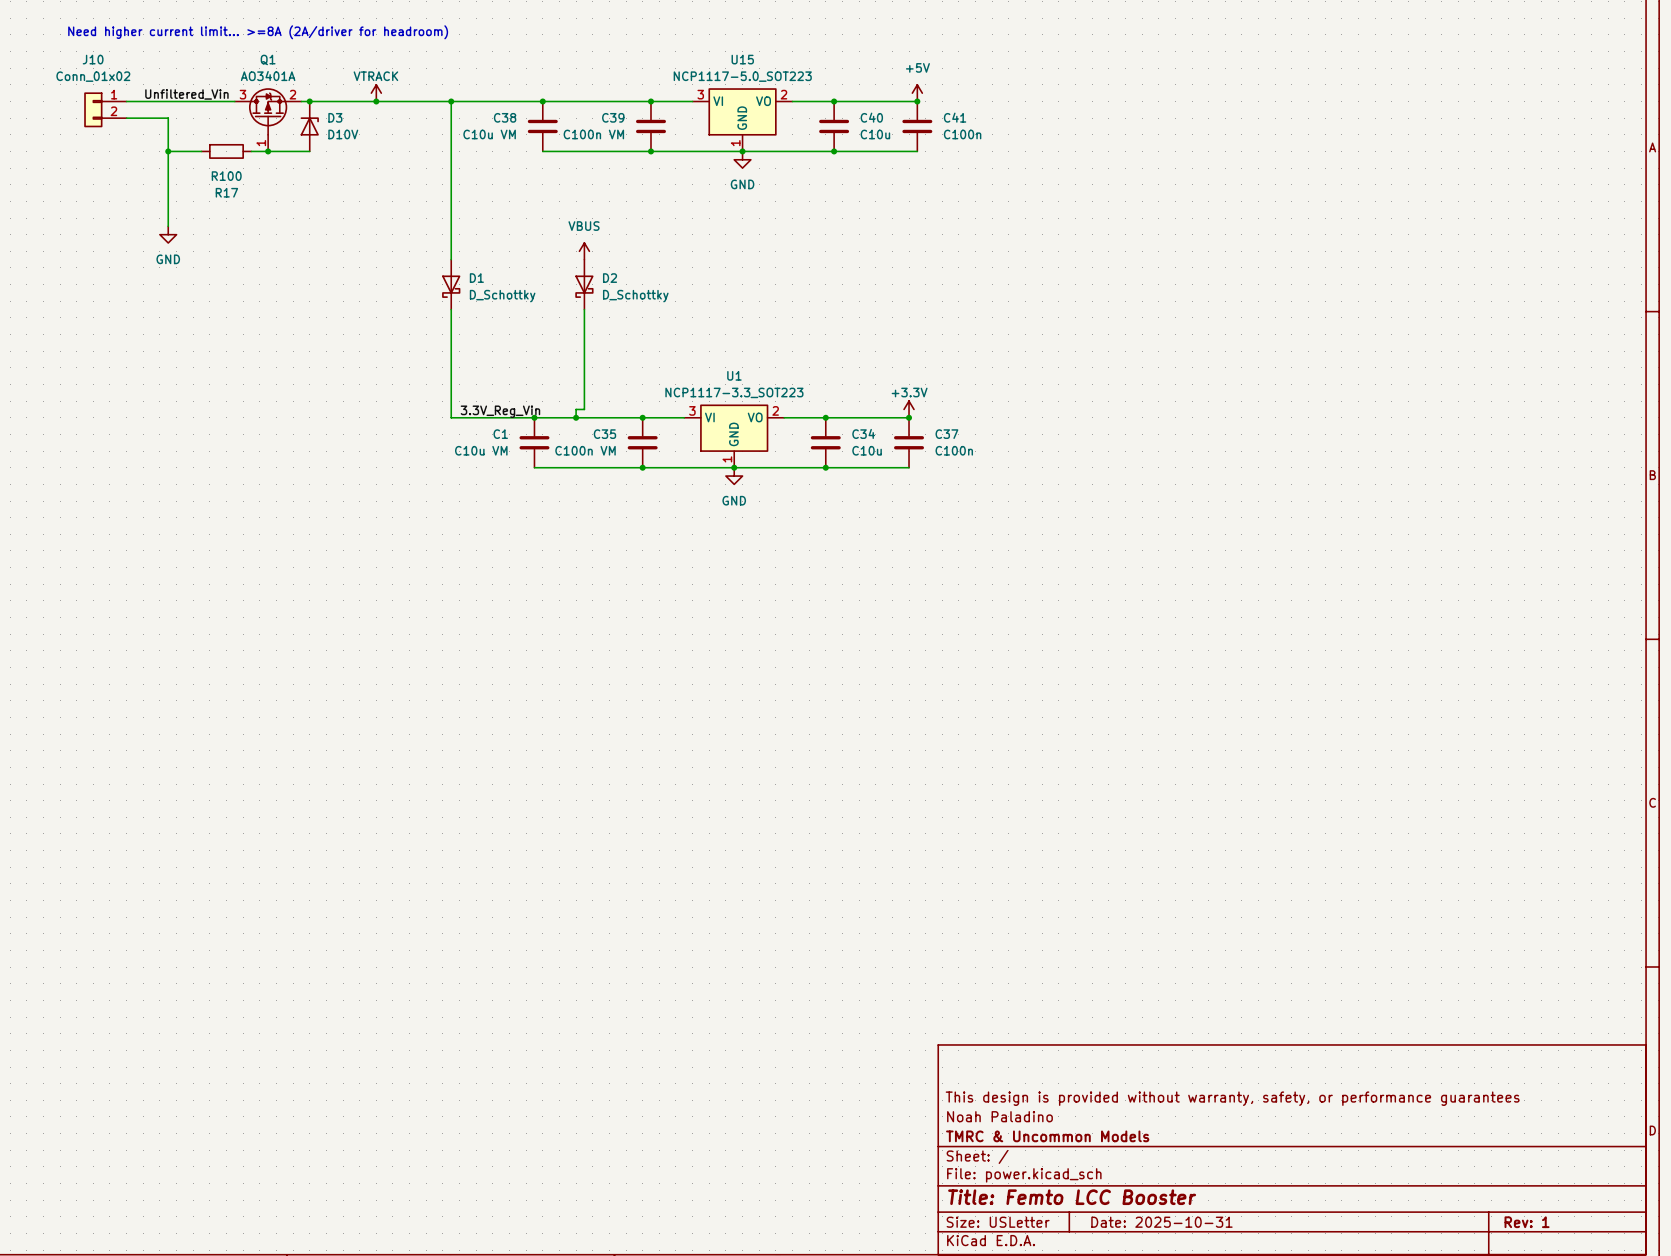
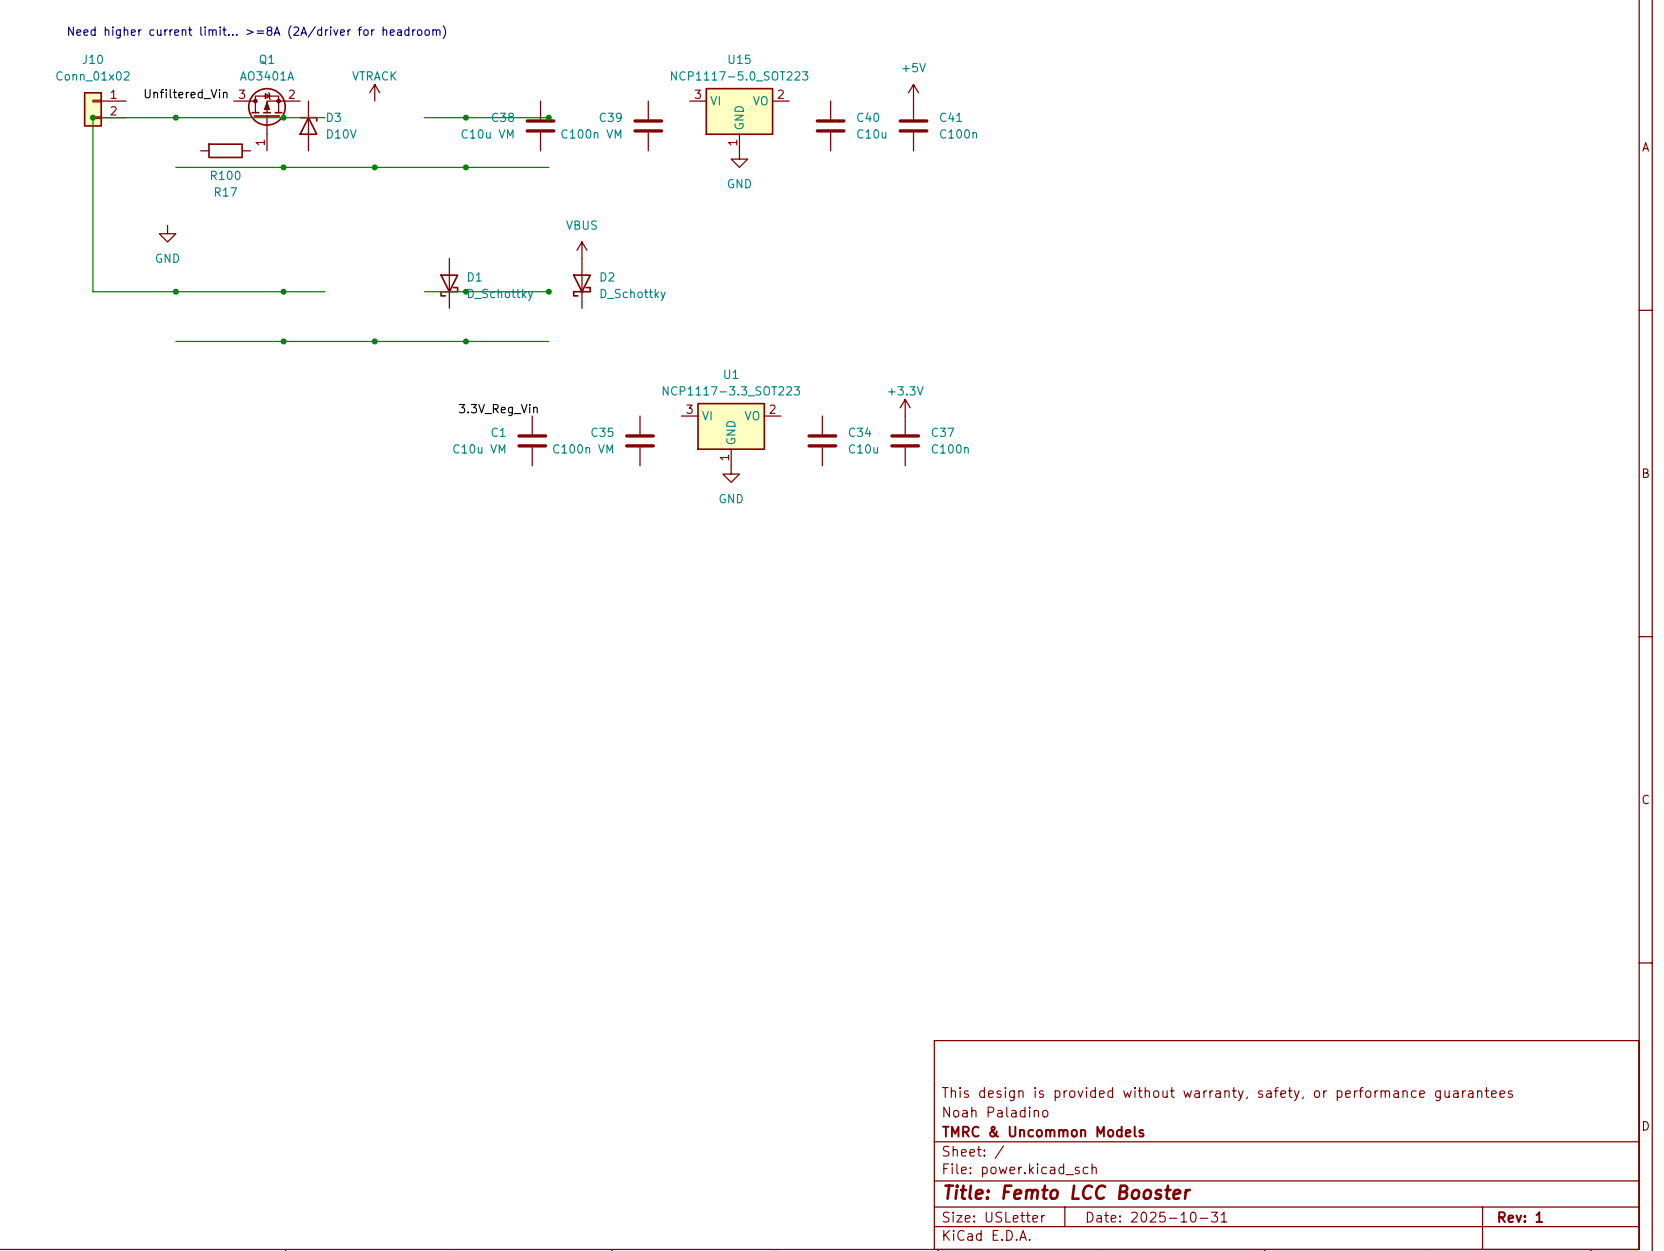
wire: (126, 101) (234, 101) -> none
wire: (301, 101) (692, 101) -> none
junction: (309, 101) -> none
junction: (376, 101) -> none
wire: (451, 101) (451, 259) -> none
junction position: (451, 101) -> (465, 117)
junction position: (542, 101) -> (548, 117)
junction: (650, 101) -> none
wire: (792, 101) (917, 101) -> none
junction: (834, 101) -> none
junction: (917, 101) -> none
junction: none -> (92, 117)
wire: none -> (126, 117) (92, 117) (92, 291) (325, 291)
wire: (168, 118) (168, 226) -> (167, 117) (325, 117)
junction: none -> (283, 117)
wire: none -> (424, 117) (548, 117)
wire: (168, 151) (201, 151) -> none
junction position: (168, 151) -> (175, 117)
wire: (251, 151) (309, 151) -> none
junction: (268, 151) -> none
wire: (542, 151) (917, 151) -> none
junction: (650, 151) -> none
junction: (742, 151) -> none
junction: (834, 151) -> none
wire: none -> (175, 167) (548, 167)
junction: none -> (283, 167)
junction: none -> (374, 167)
junction: none -> (465, 167)
junction: none -> (175, 291)
junction: none -> (283, 291)
wire: none -> (424, 291) (548, 291)
junction: none -> (465, 291)
junction: none -> (548, 291)
wire: (451, 309) (451, 417) (684, 417) -> none
wire: (584, 309) (584, 409) (576, 409) (576, 417) -> none
wire: none -> (175, 341) (548, 341)
junction: none -> (283, 341)
junction: none -> (374, 341)
junction: none -> (465, 341)
junction: (534, 417) -> none
junction: (576, 417) -> none
junction: (642, 417) -> none
wire: (784, 417) (909, 417) -> none
junction: (825, 417) -> none
junction: (909, 417) -> none
wire: (534, 467) (909, 467) -> none
junction: (642, 467) -> none
junction: (734, 467) -> none
junction: (825, 467) -> none

